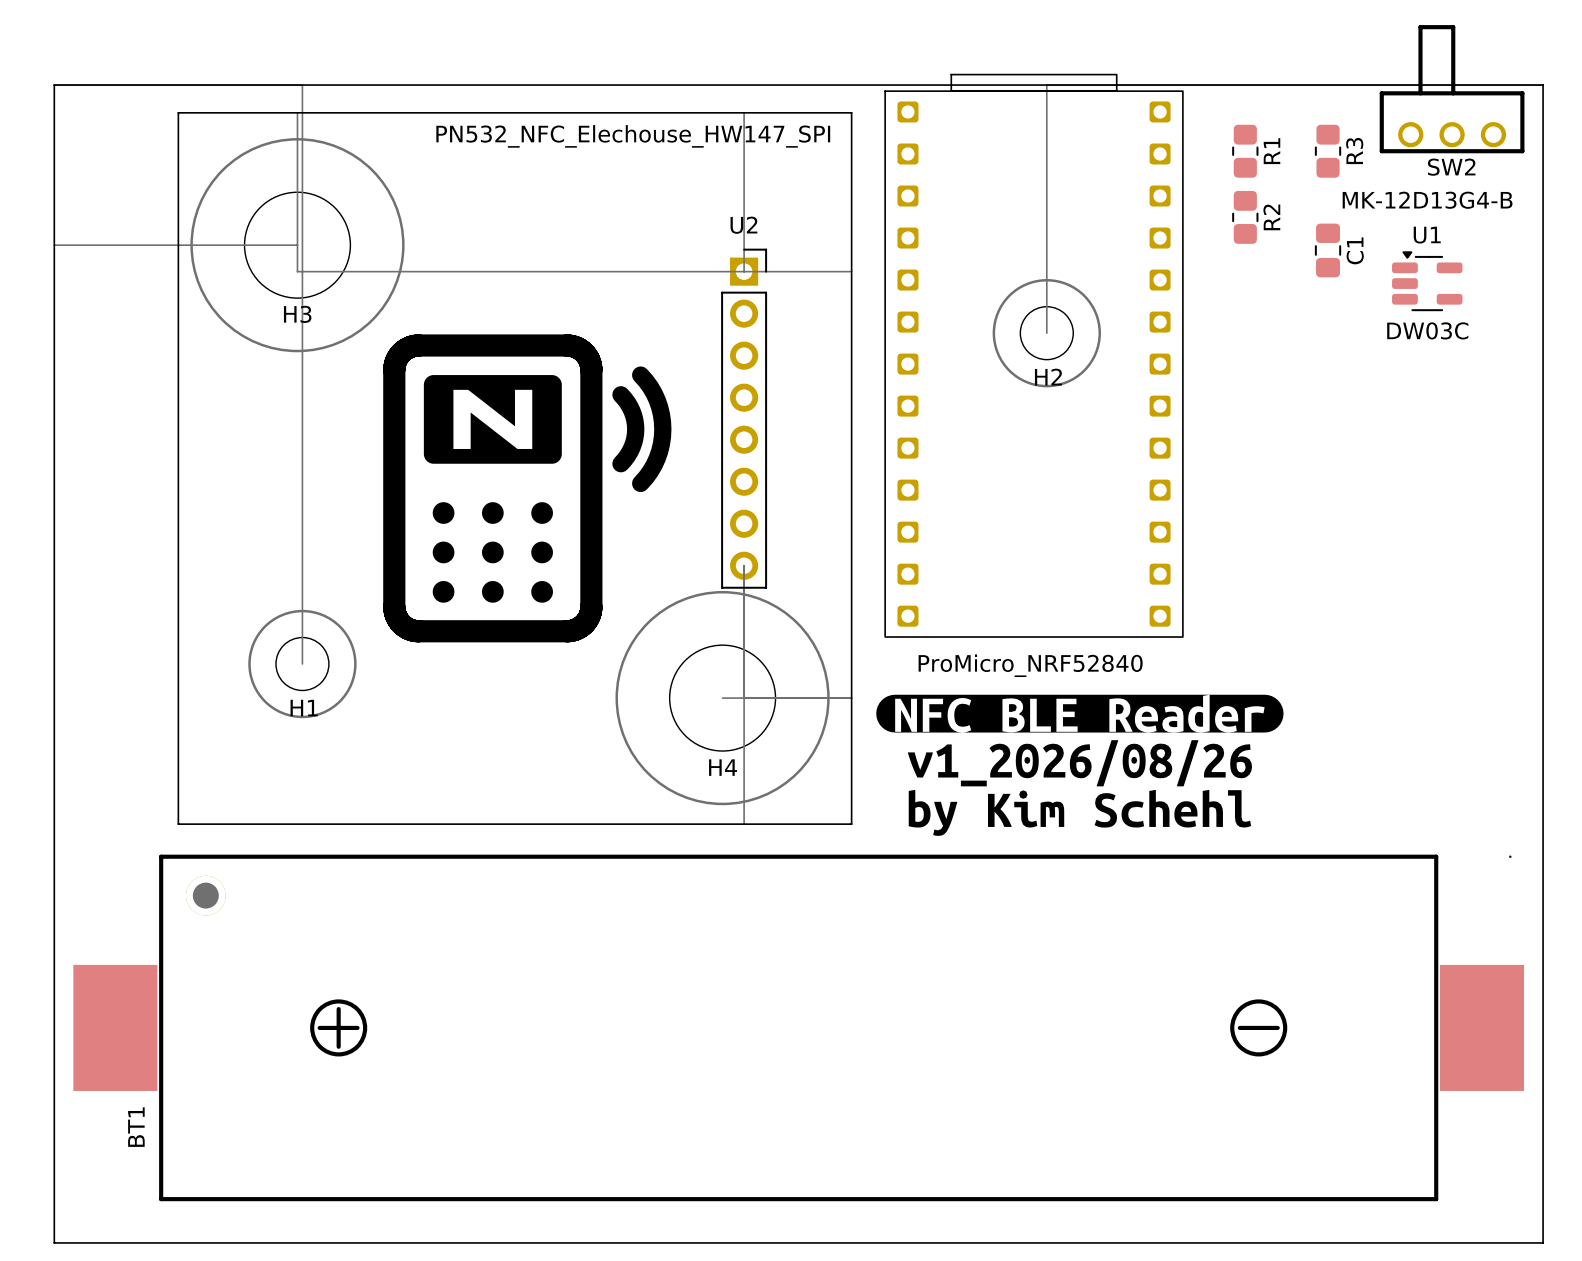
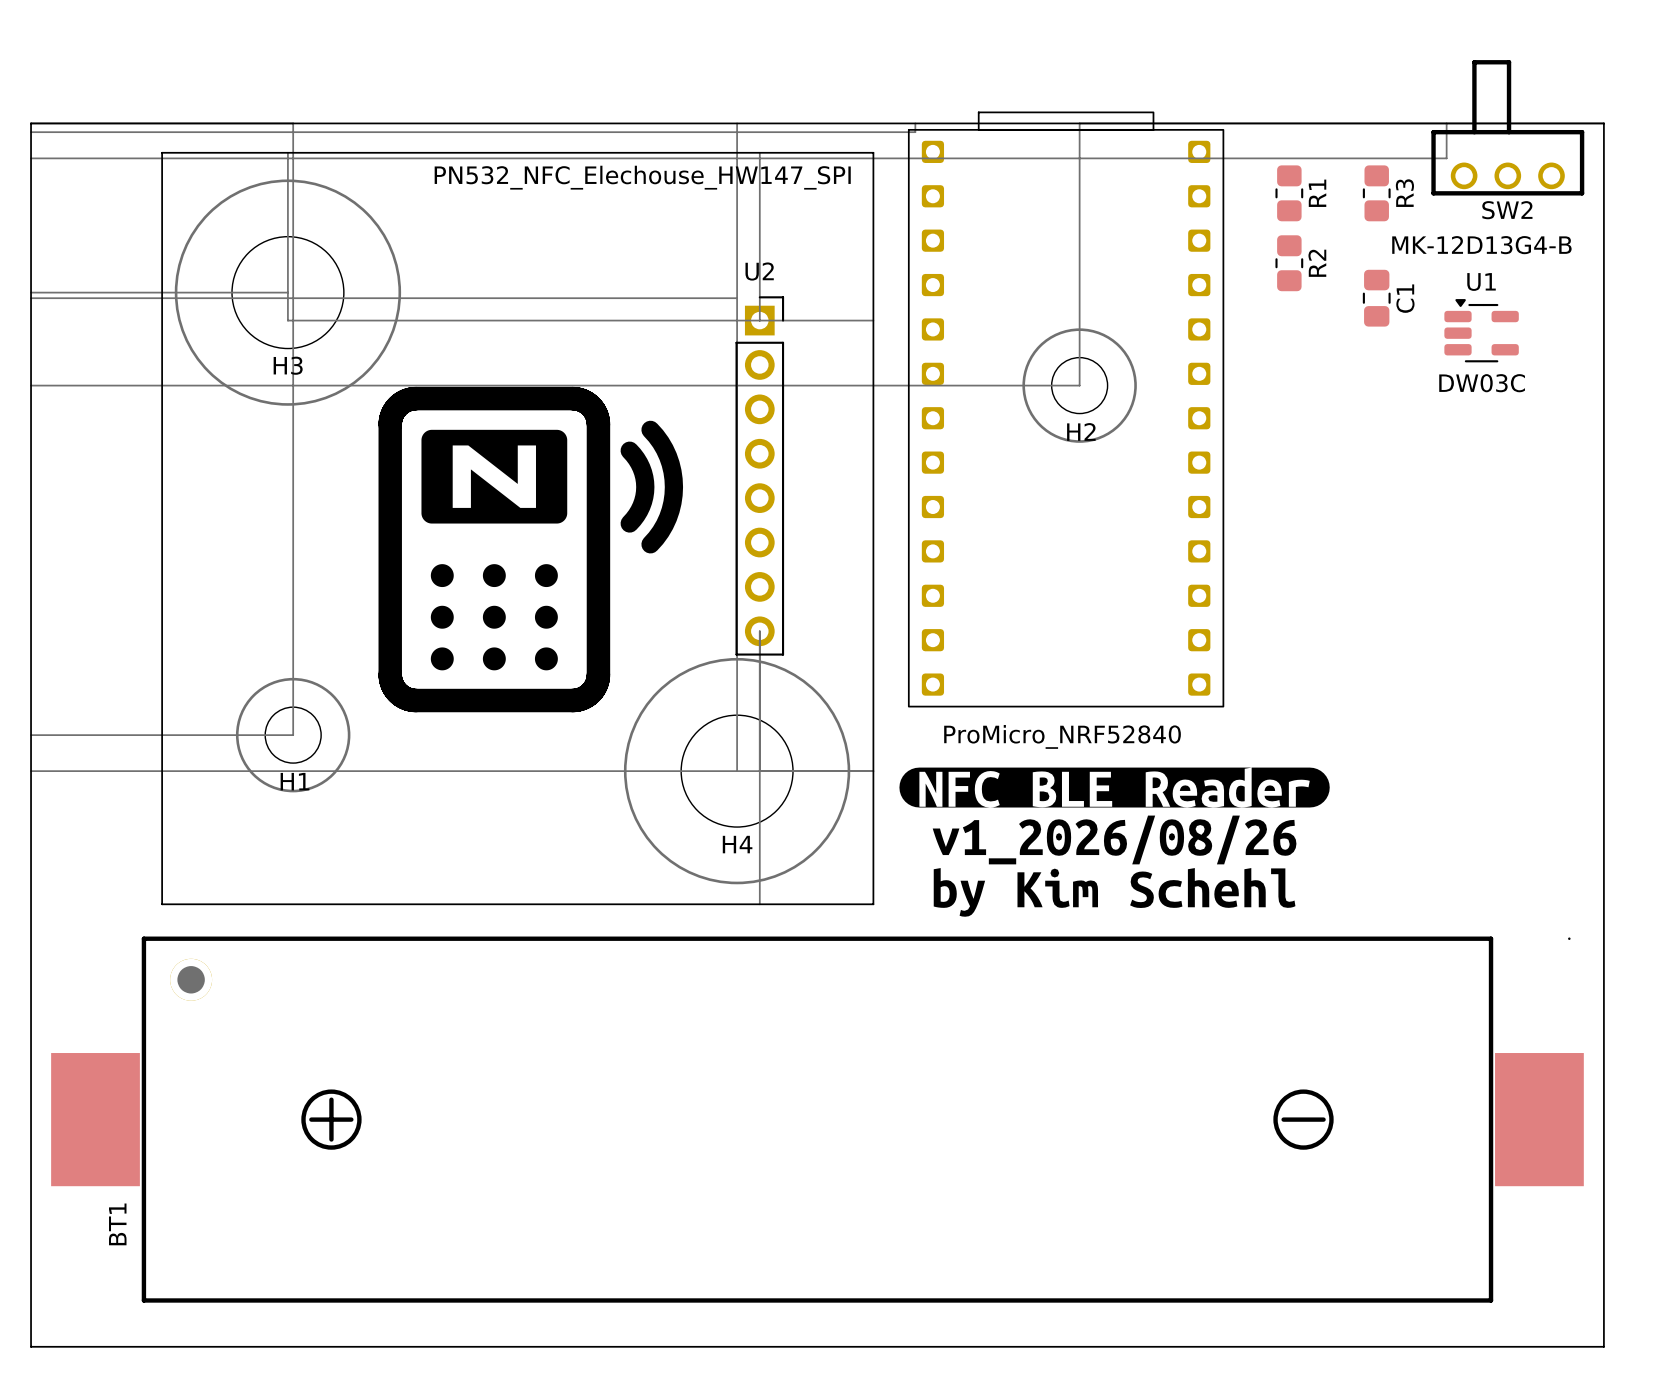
line: none -> (737, 123) (737, 771) (31, 771)
line: none -> (915, 123) (915, 132) (31, 132)
line: none -> (1446, 123) (1446, 158) (31, 158)
line: none -> (31, 298) (737, 298)
line: none -> (31, 385) (1079, 385)
line: none -> (31, 735) (293, 735)

